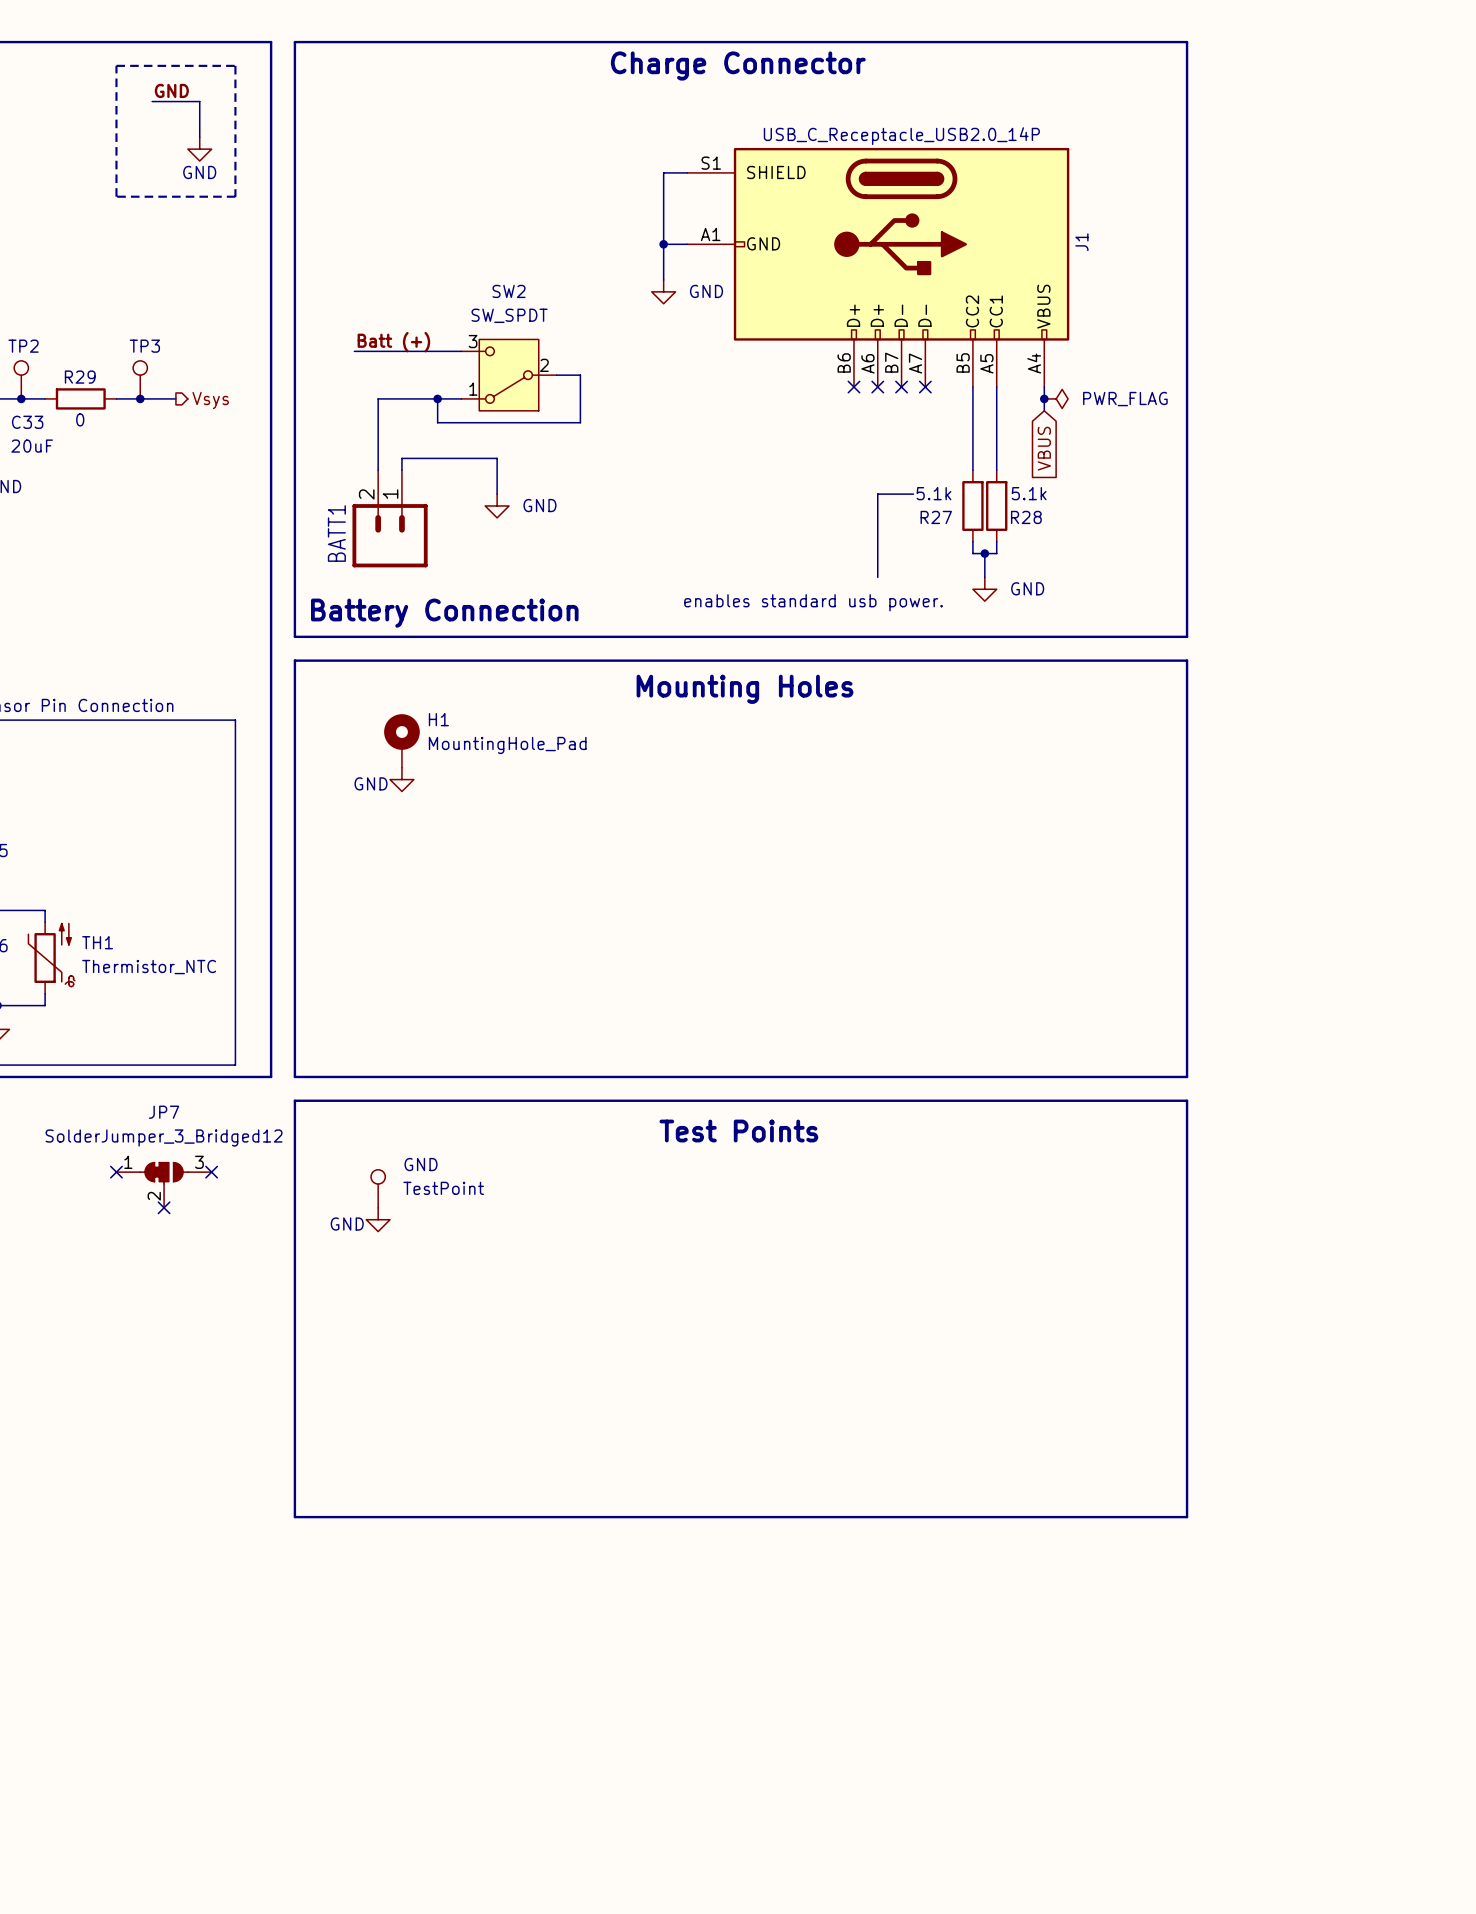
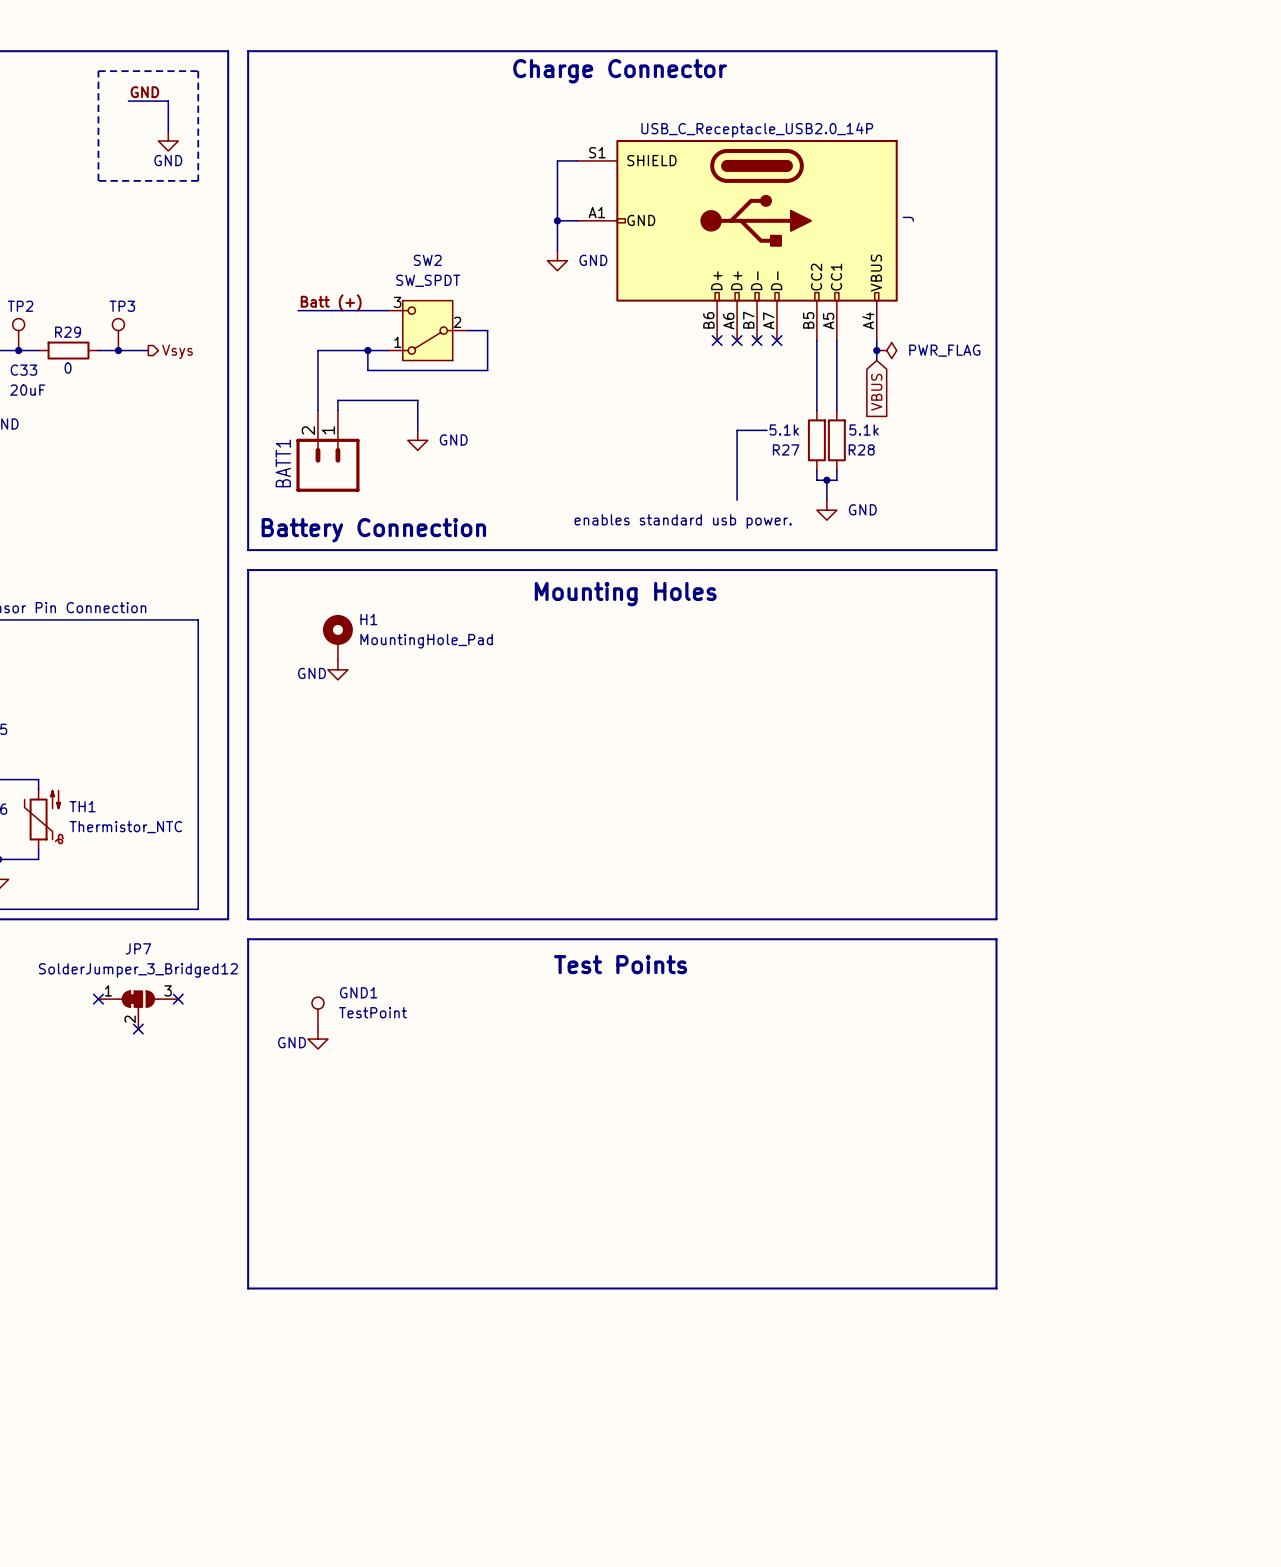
J1 name: J1 (1081, 242) -> J (908, 219)
GND name: GND (421, 1164) -> GND1 (358, 992)

